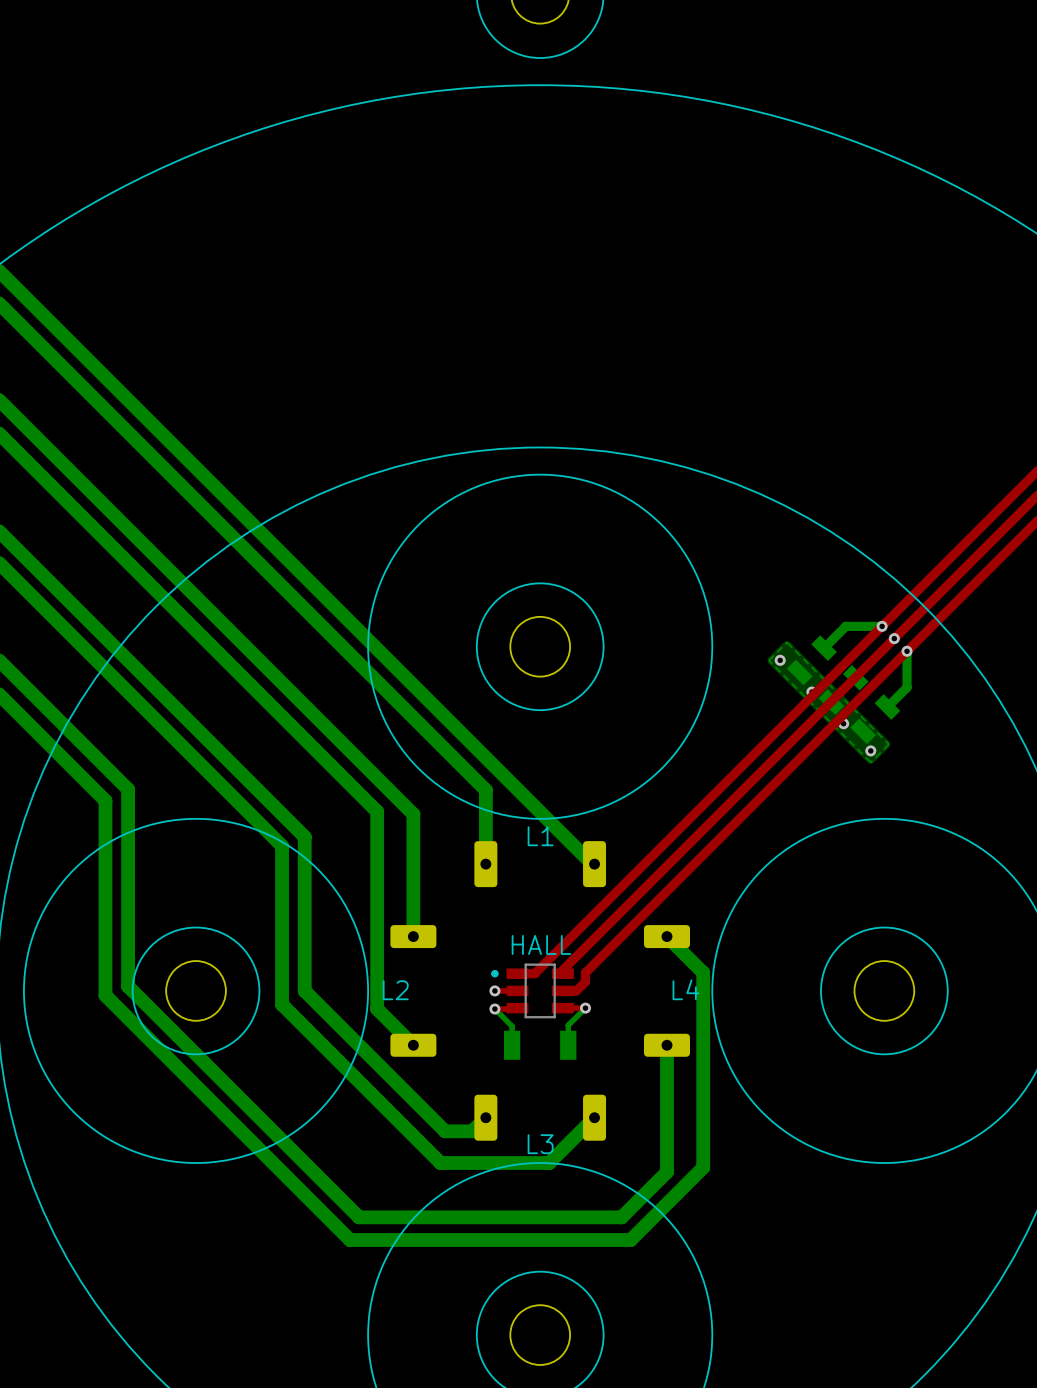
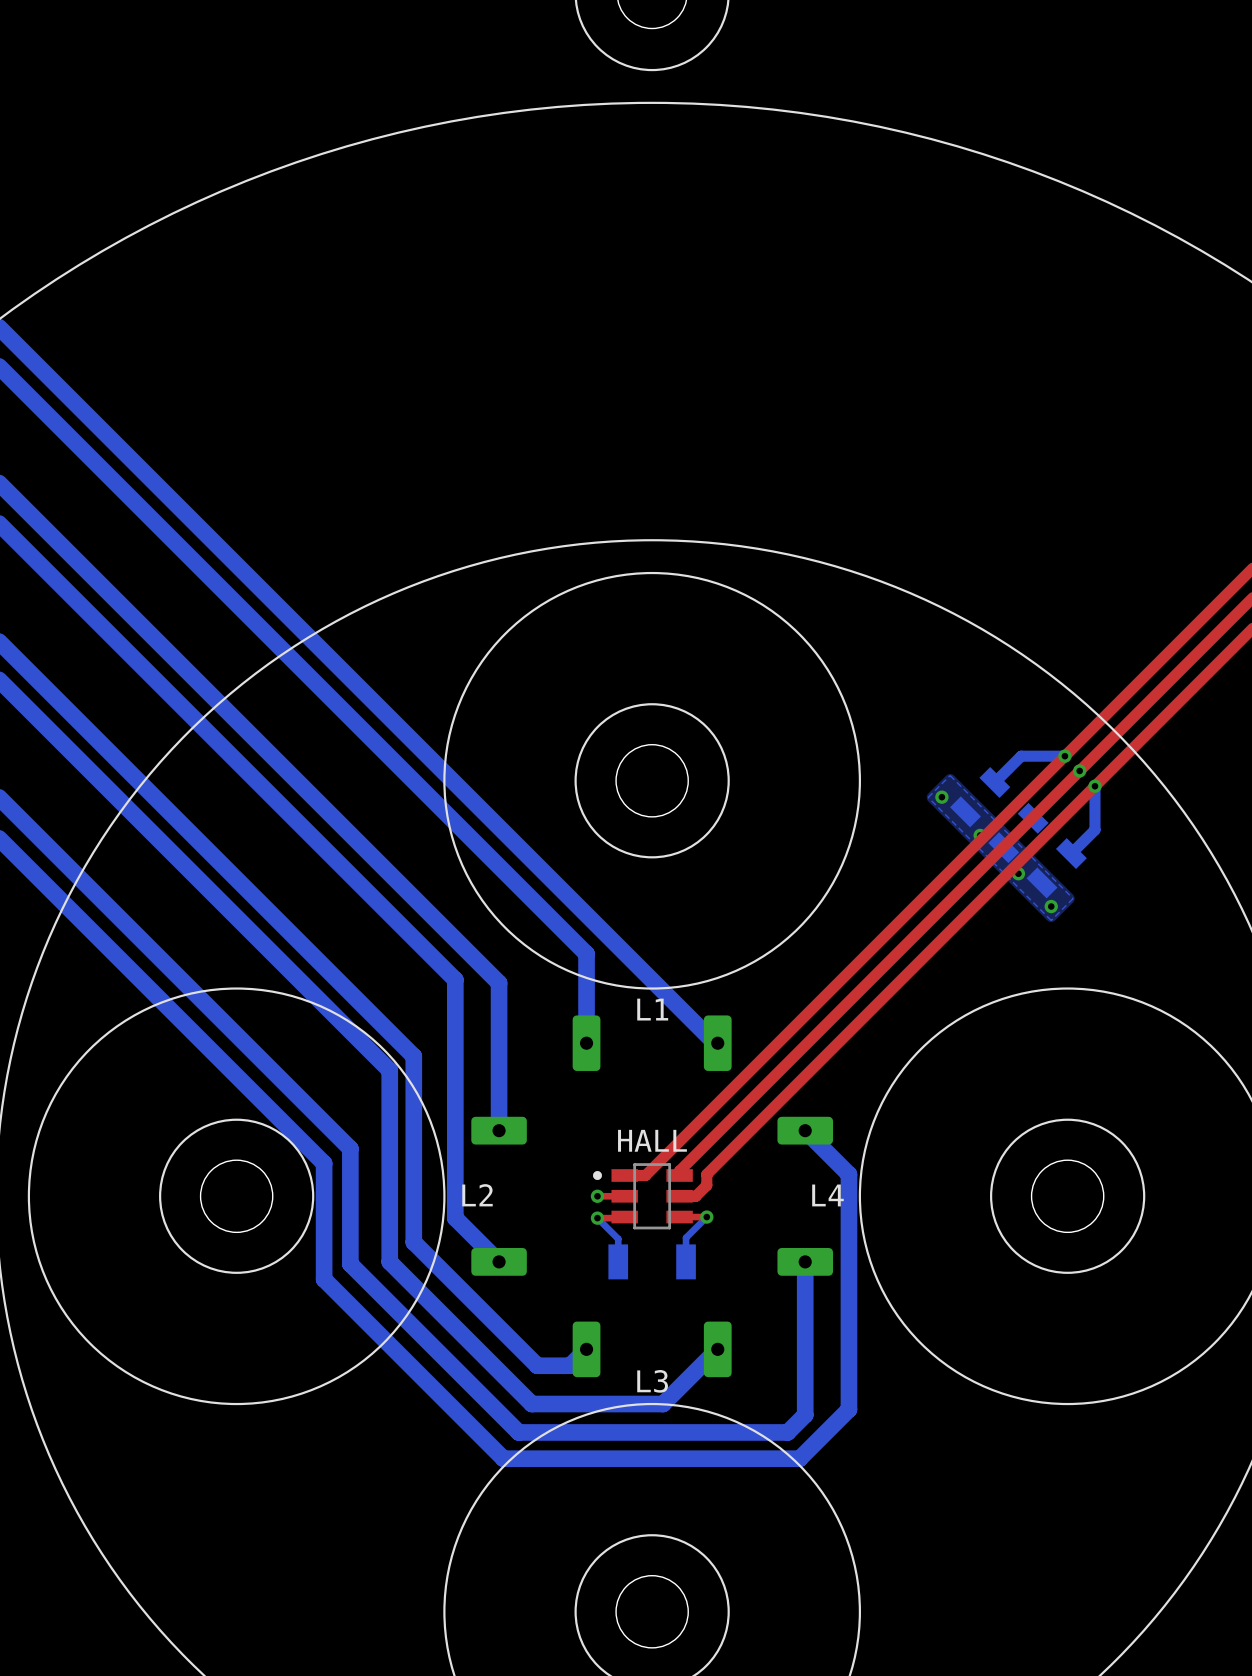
bottom track: (128, 789) (128, 986) (359, 1217) (621, 1217) (652, 1186) -> (154, 952) (350, 1148) (350, 1264) (518, 1432) (787, 1432)
bottom track: (105, 800) (105, 995) (350, 1239) (630, 1239) (662, 1208) -> (127, 966) (324, 1163) (324, 1279) (503, 1458) (799, 1458)
bottom track: (304, 836) (304, 990) (342, 1028) -> (367, 1010) (413, 1056) (413, 1242)
bottom track: (282, 846) (282, 1004) (322, 1045) -> (340, 1021) (389, 1070) (389, 1261)

